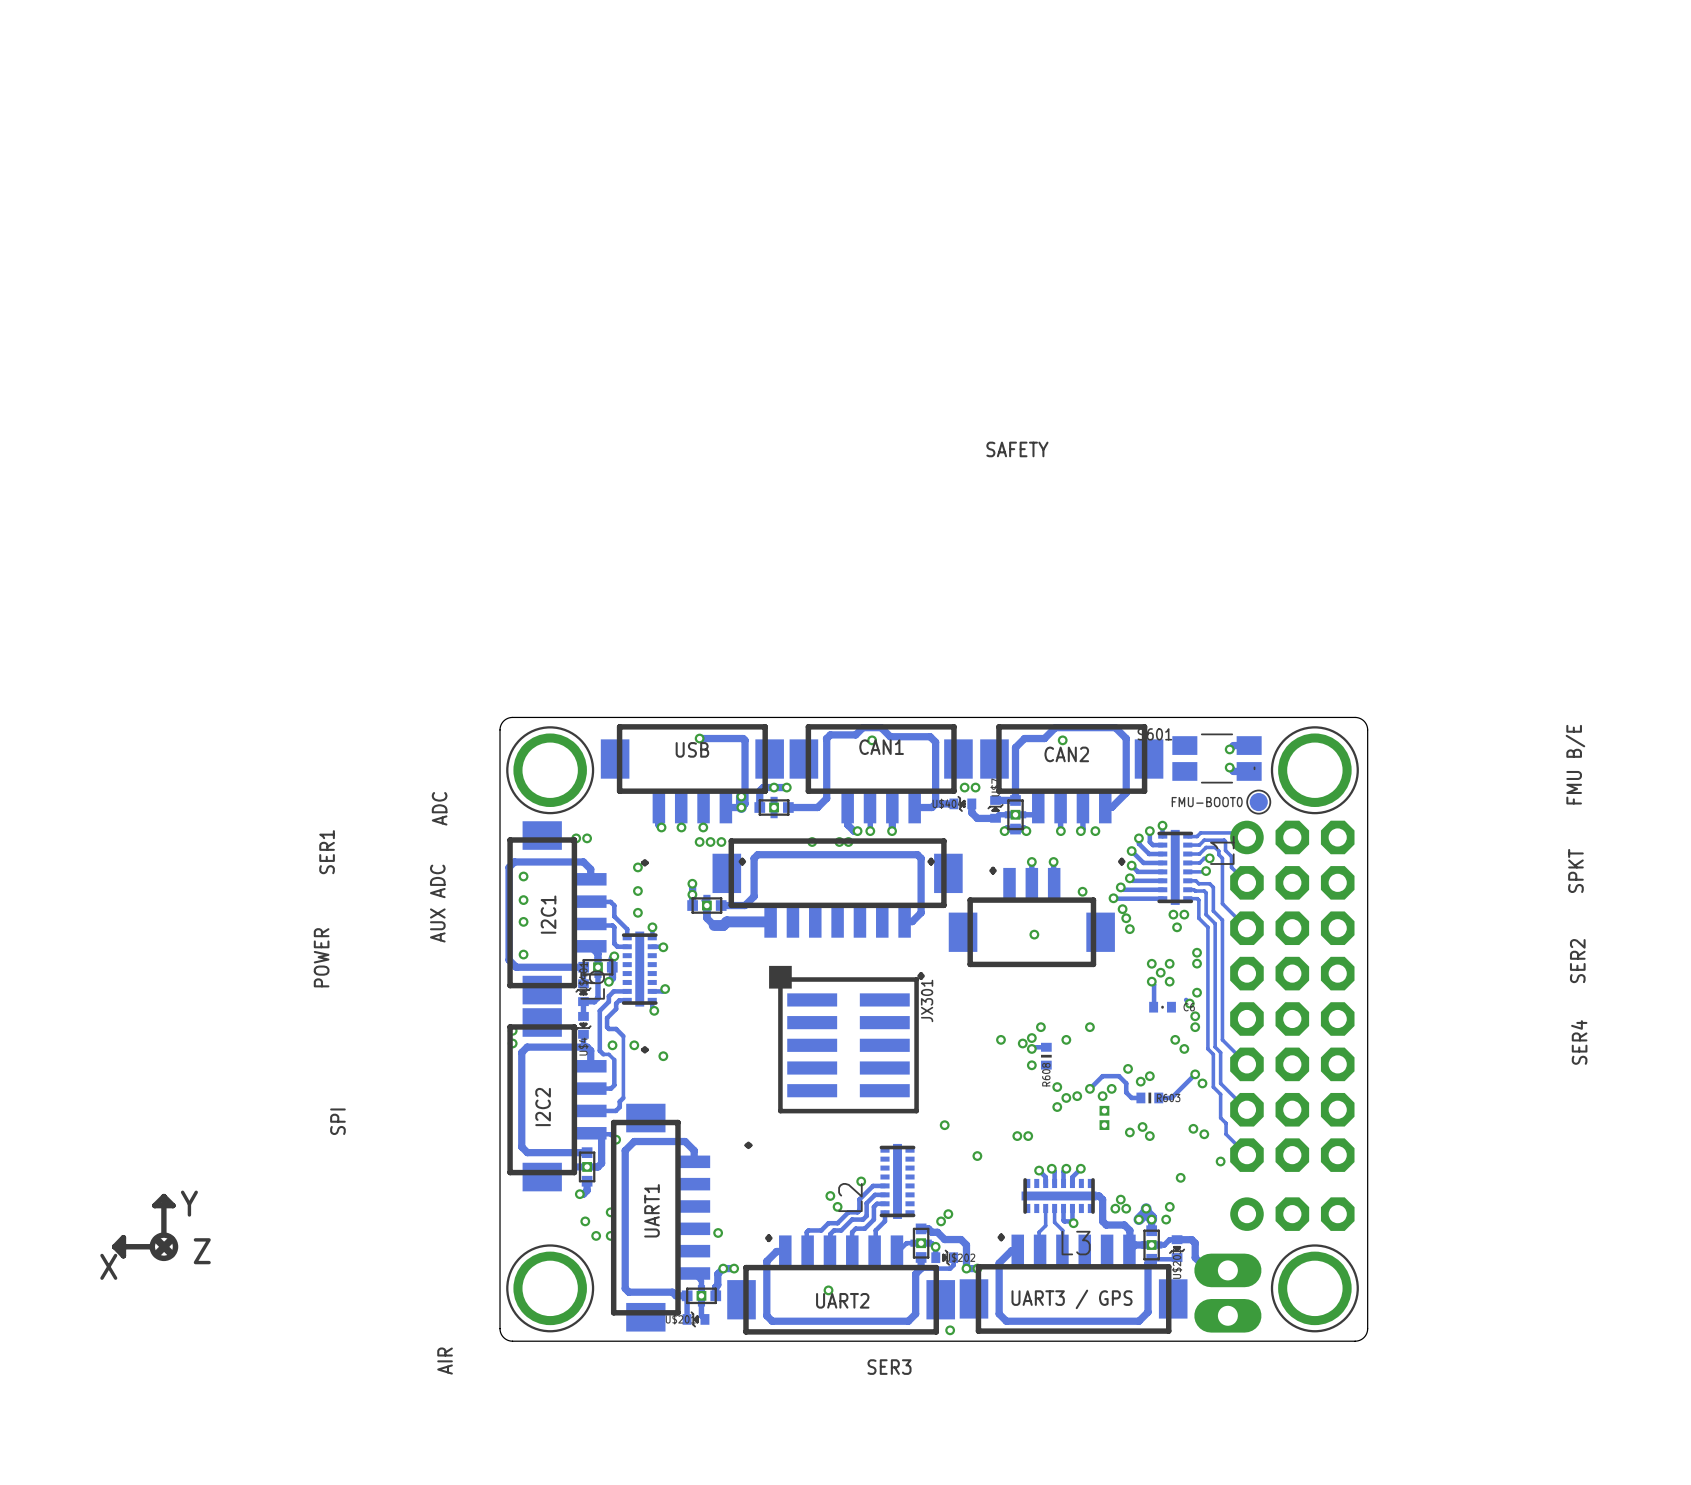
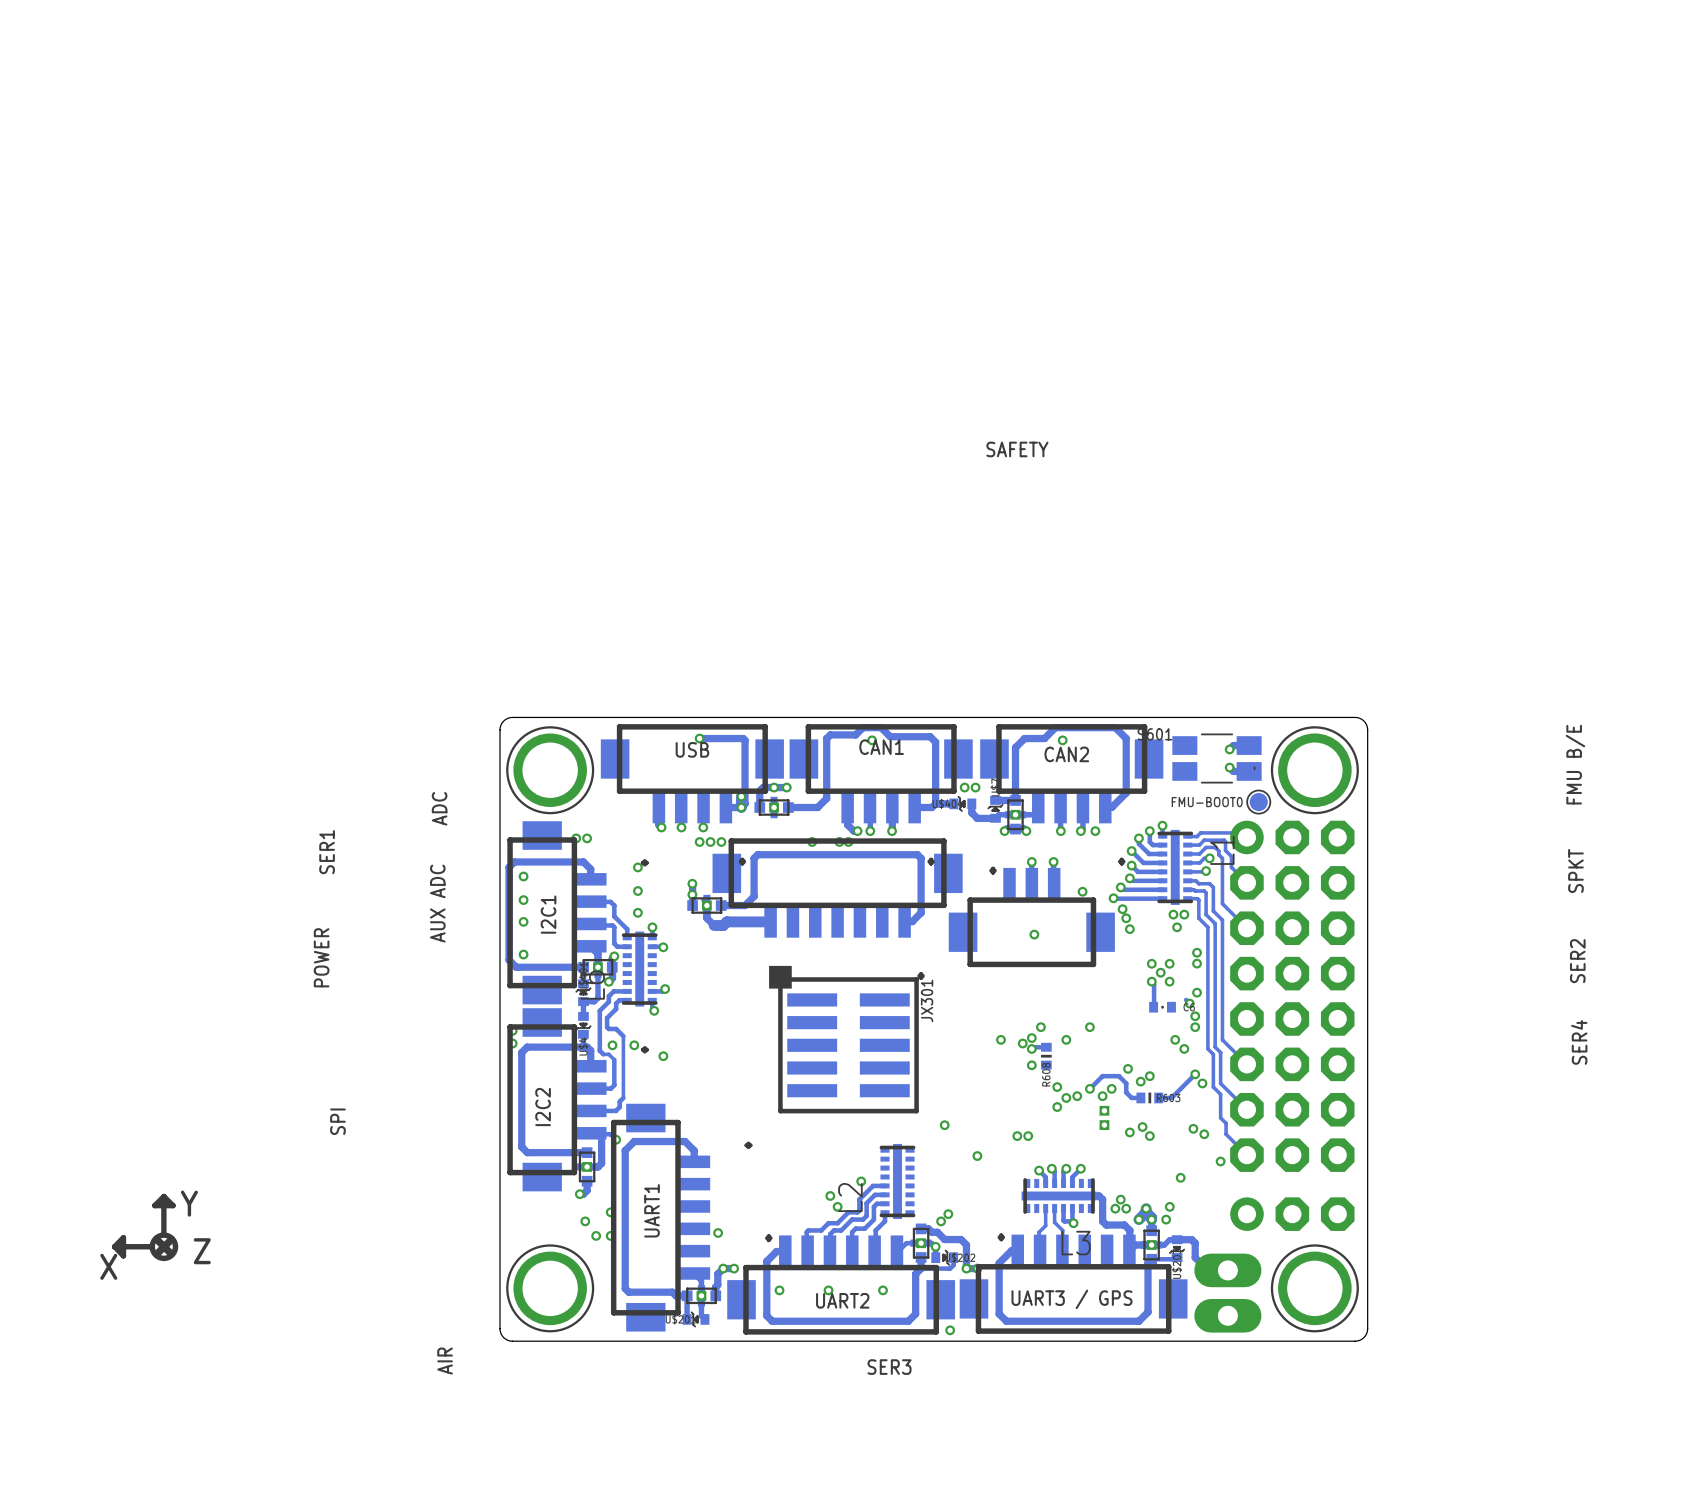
via: none -> (779, 1290)
via: none -> (882, 1290)

